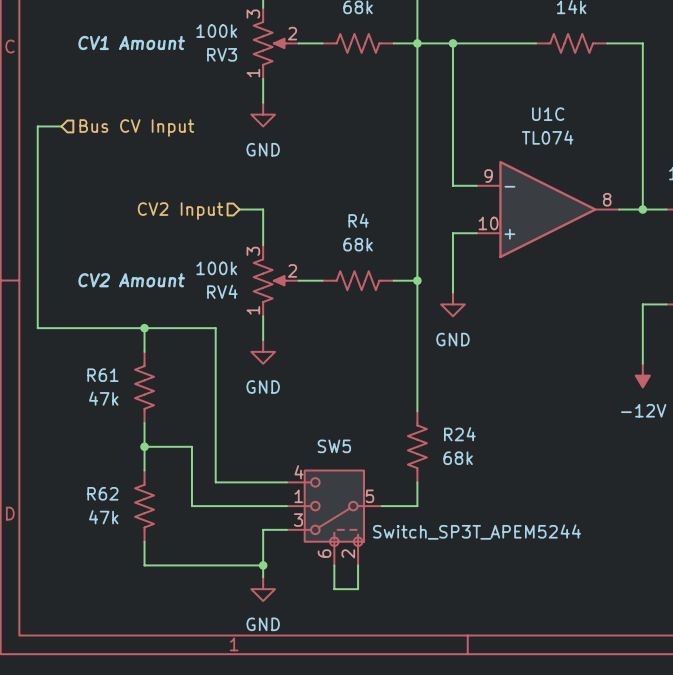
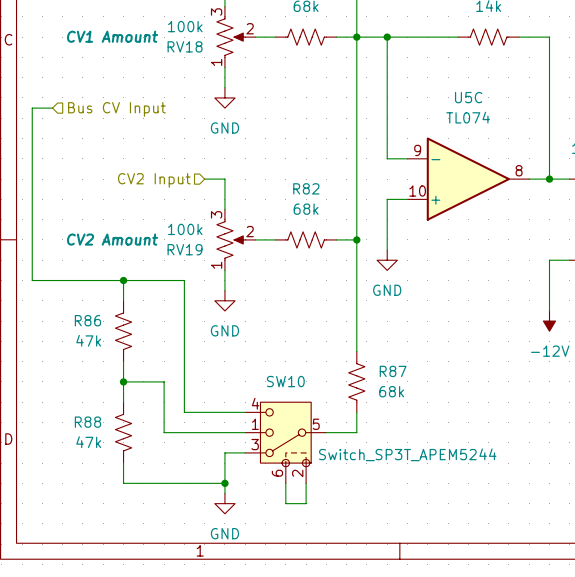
RV3 name: RV3 (222, 54) -> RV18 (185, 46)
U1C name: U1C (548, 114) -> U5C (468, 97)
R4 name: R4 (358, 220) -> R82 (306, 188)
RV4 name: RV4 (222, 291) -> RV19 (185, 249)
R61 name: R61 (102, 375) -> R86 (87, 320)
R24 name: R24 (459, 434) -> R87 (393, 371)
SW5 name: SW5 (334, 446) -> SW10 (285, 381)
R62 name: R62 (102, 493) -> R88 (87, 422)

